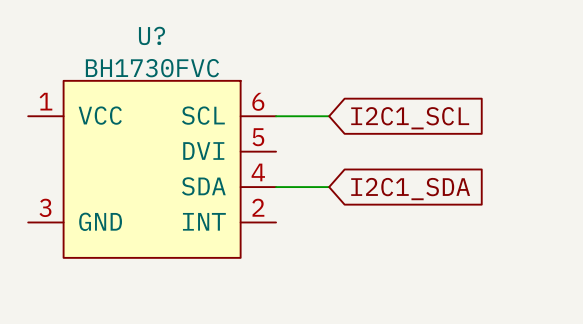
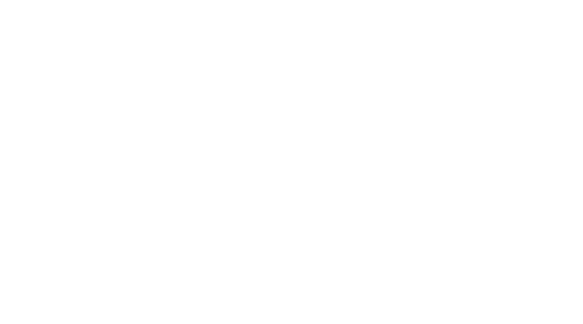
wire: (276, 116) (329, 116) -> none
global label: I2C1_SCL (410, 118) -> none
U?: BH1730FVC (152, 169) -> none
wire: (276, 187) (329, 187) -> none
global label: I2C1_SDA (410, 189) -> none

